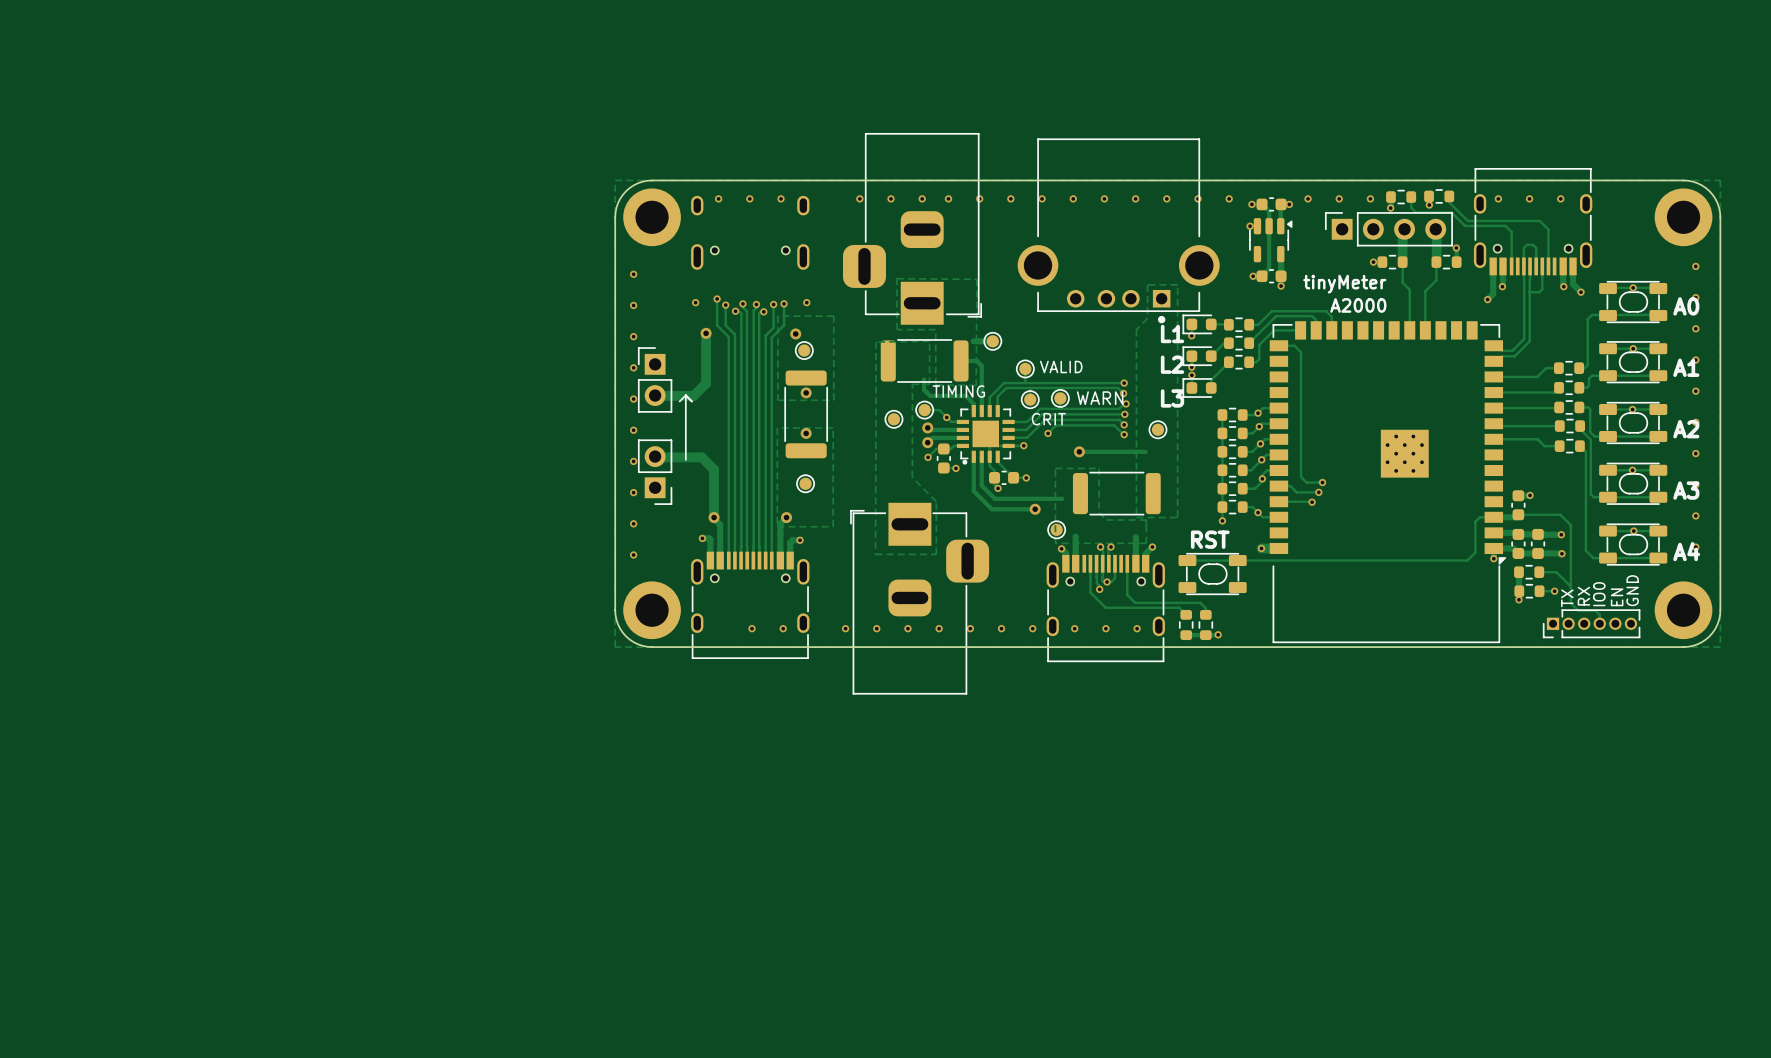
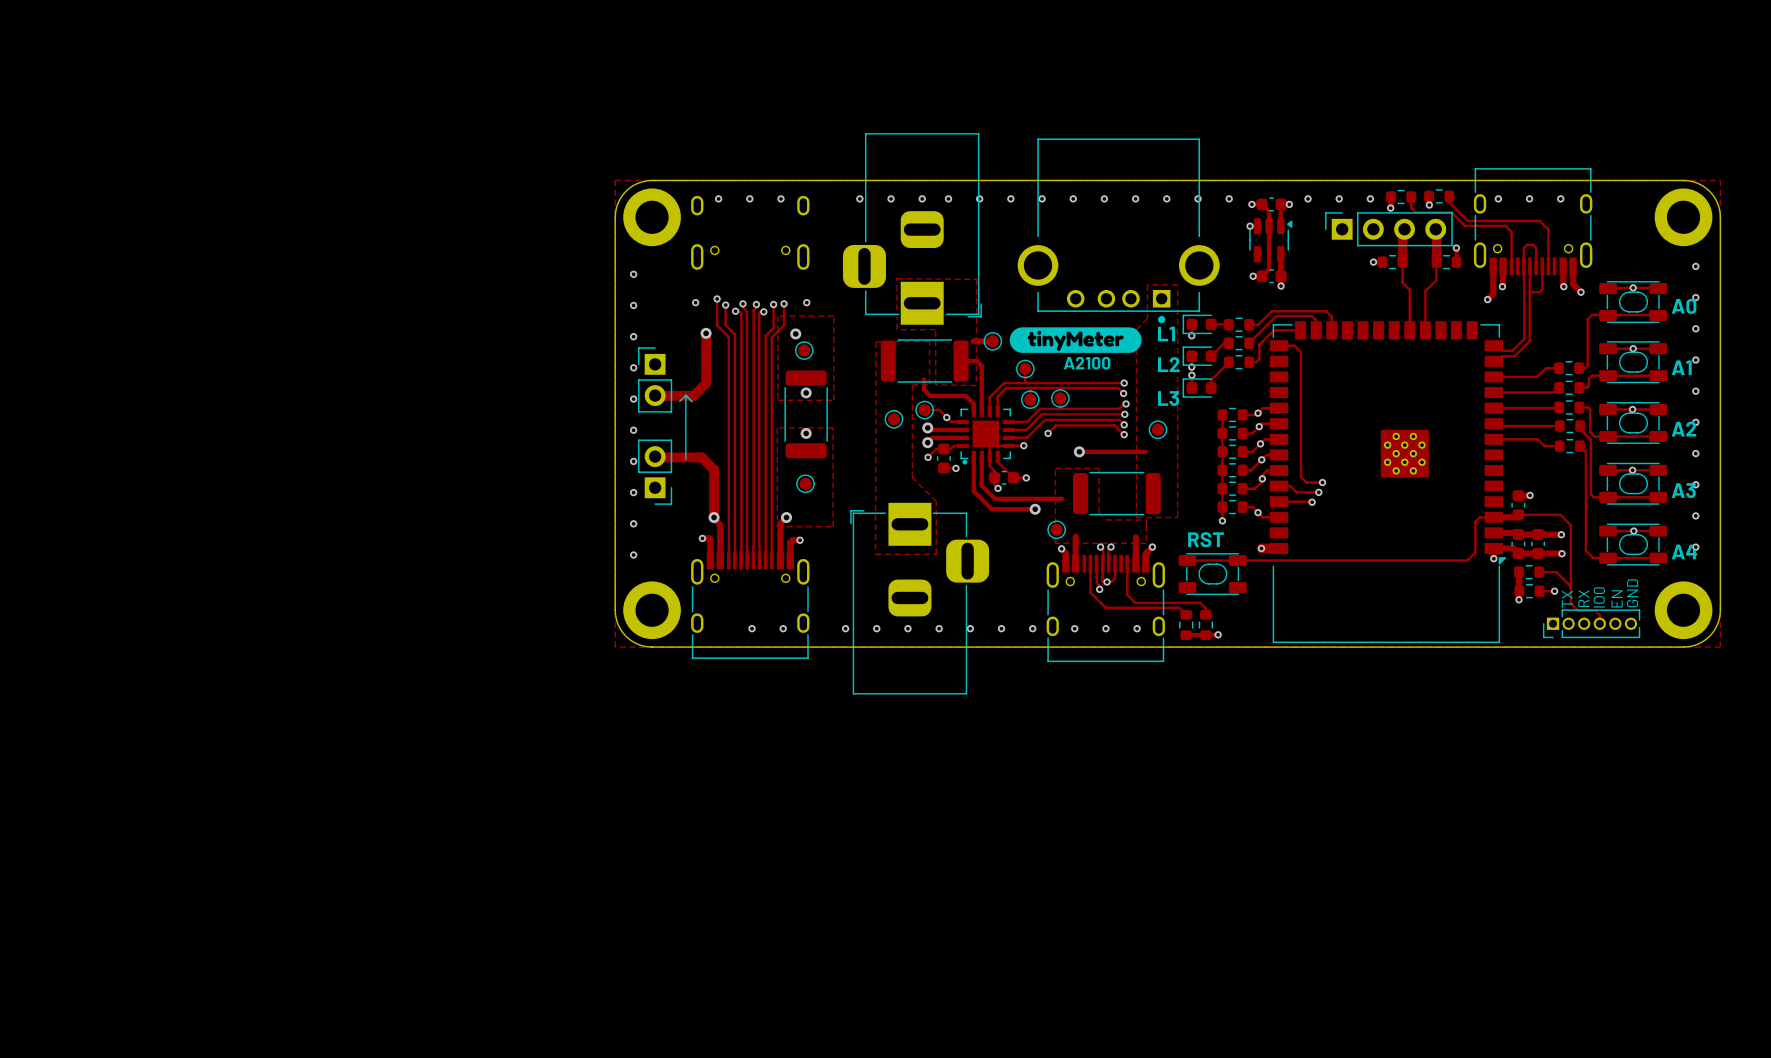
text: tinyMeter (1344, 284) -> none
text: A2000 (1358, 305) -> none
drawing: none -> [1009, 327, 1142, 353]
text: none -> A2100 (1087, 363)
text: VALID (1061, 366) -> none
text: TIMING (958, 391) -> none
text: WARN (1100, 398) -> none
text: CRIT (1048, 419) -> none

